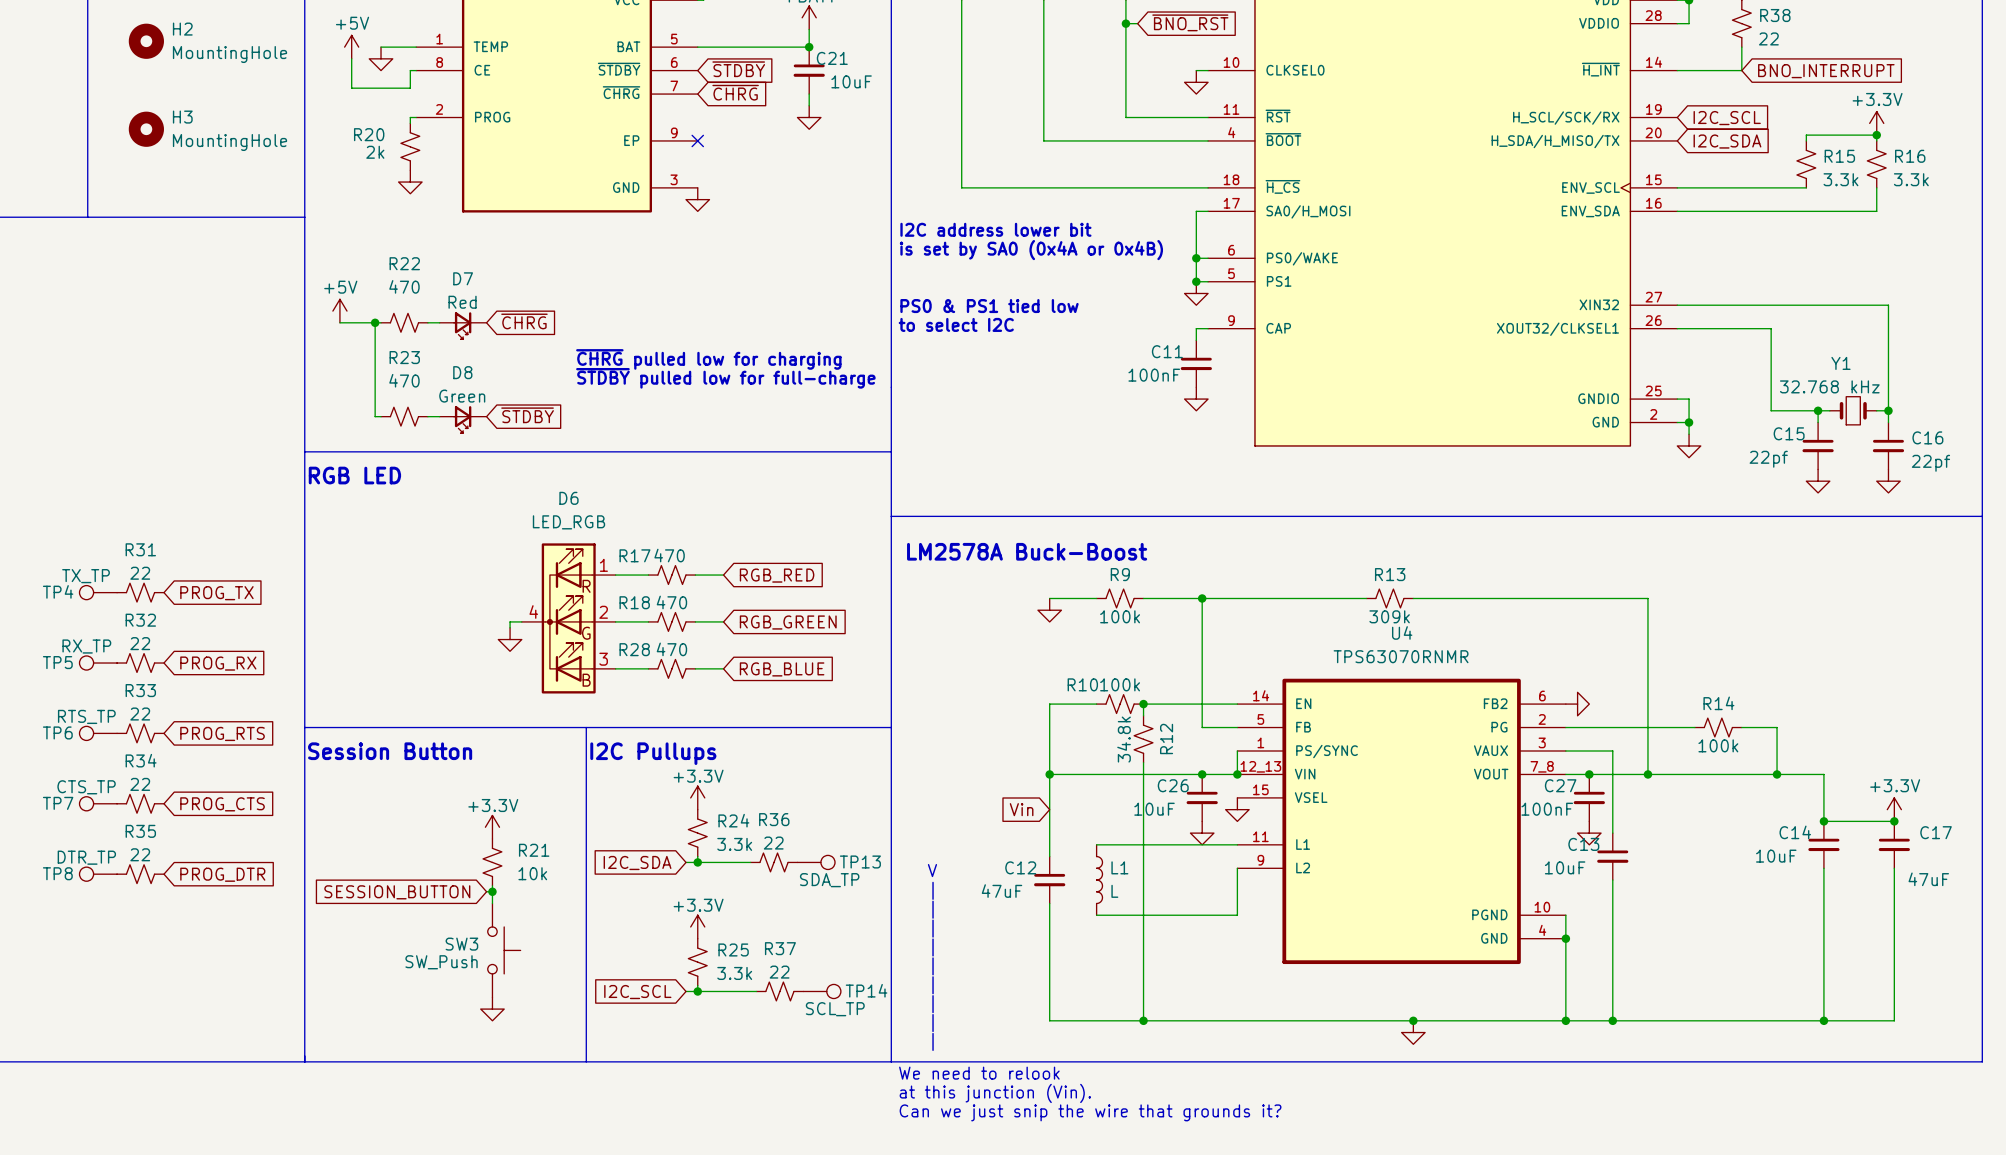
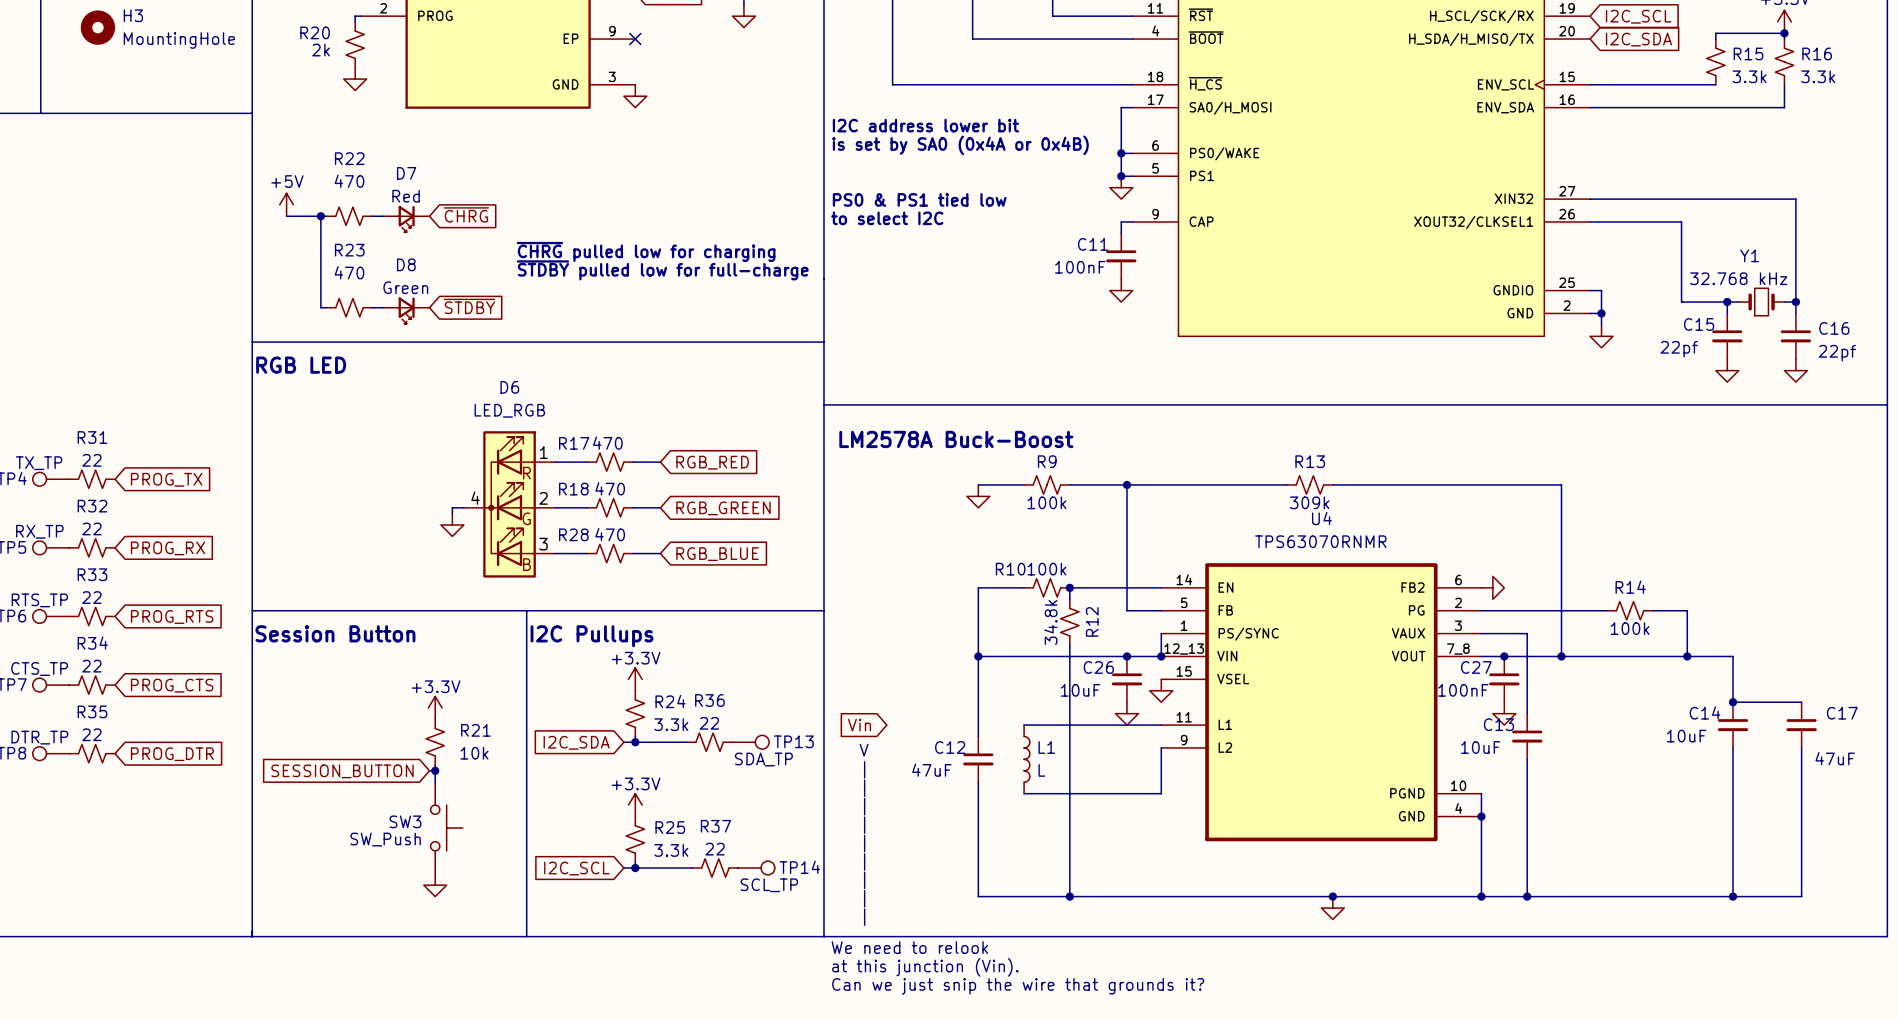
global label position: Vin (1021, 809) -> Vin (859, 725)
power symbol: +3.3V (1894, 809) -> none
junction: (1894, 821) -> none

